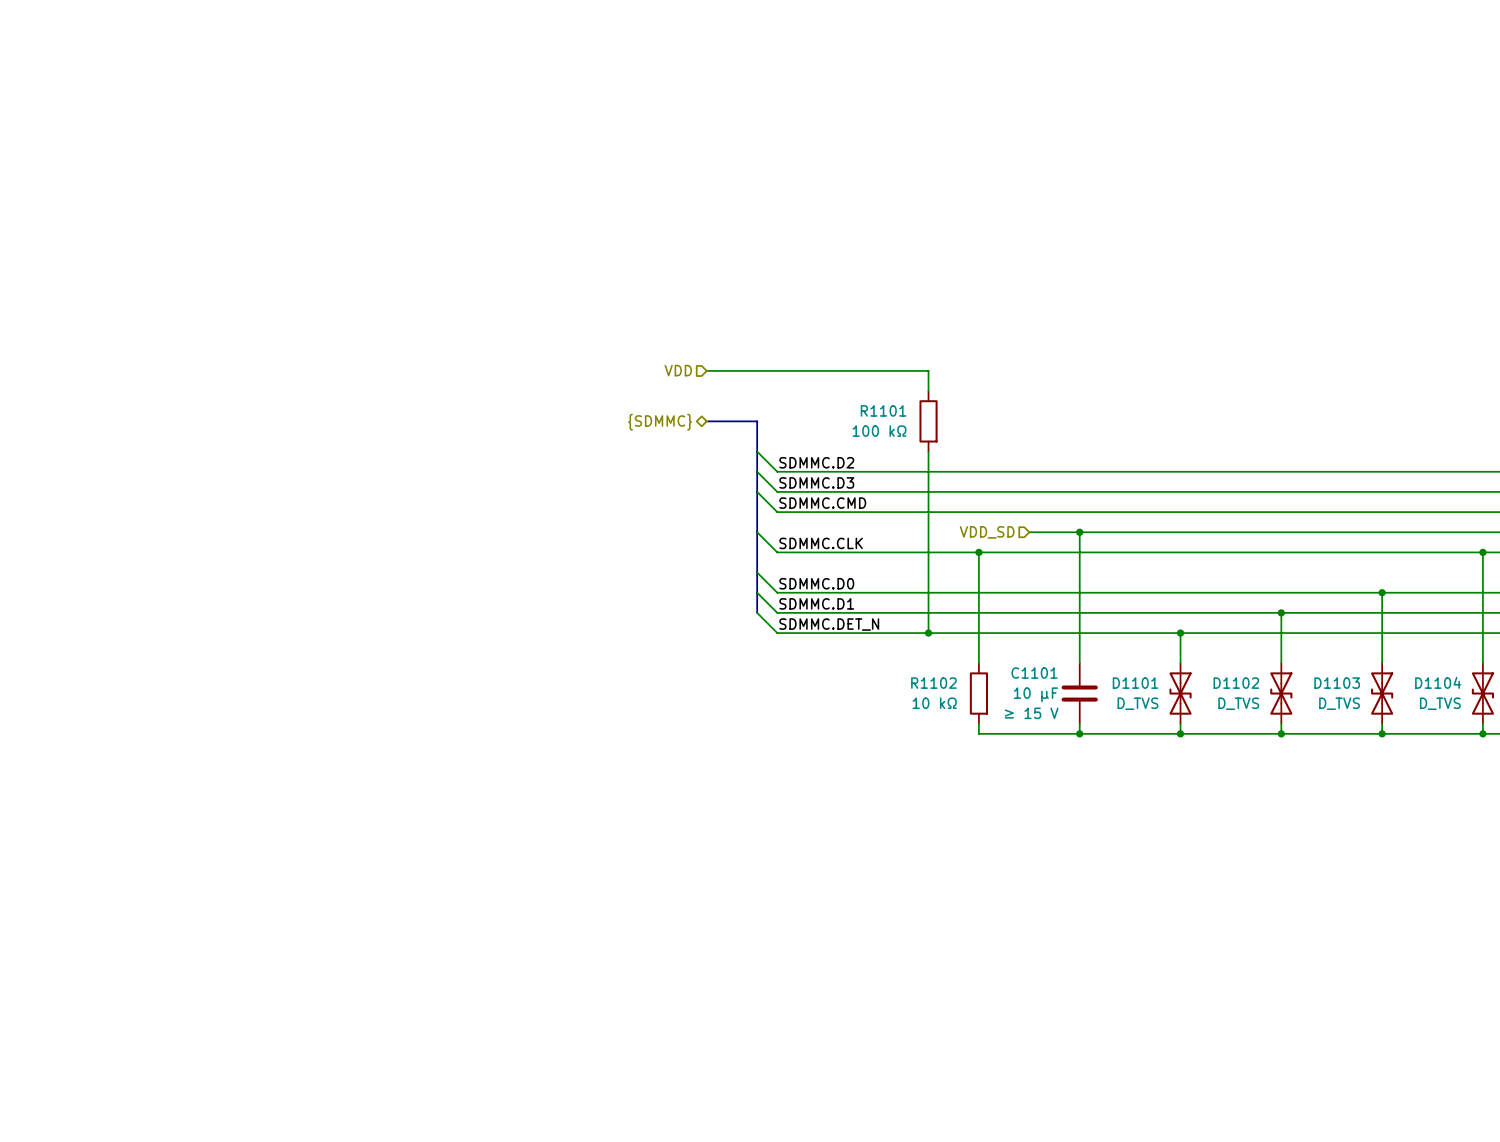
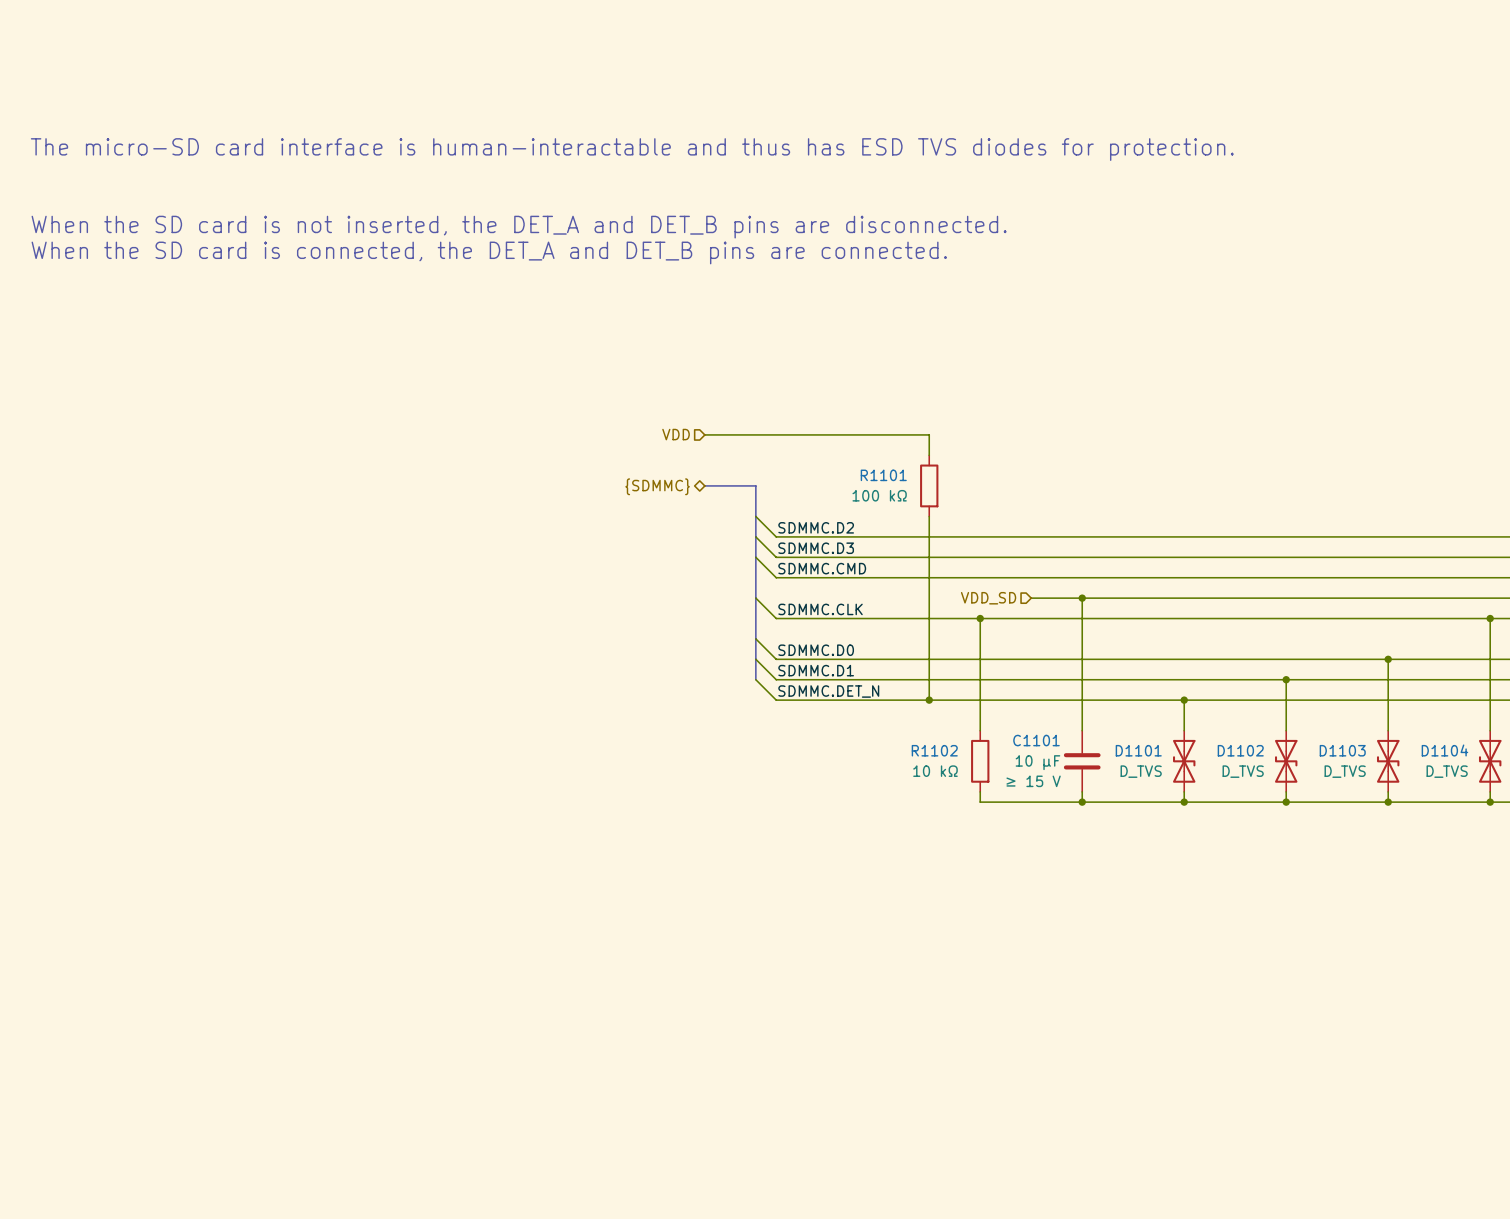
text: none -> The micro-SD card interface is human-interactable and thus has ESD TVS diodes for protection. (632, 149)
text: none -> When the SD card is not inserted, the DET_A and DET_B pins are disconnected. (519, 227)
text: none -> When the SD card is connected, the DET_A and DET_B pins are connected. (489, 252)

